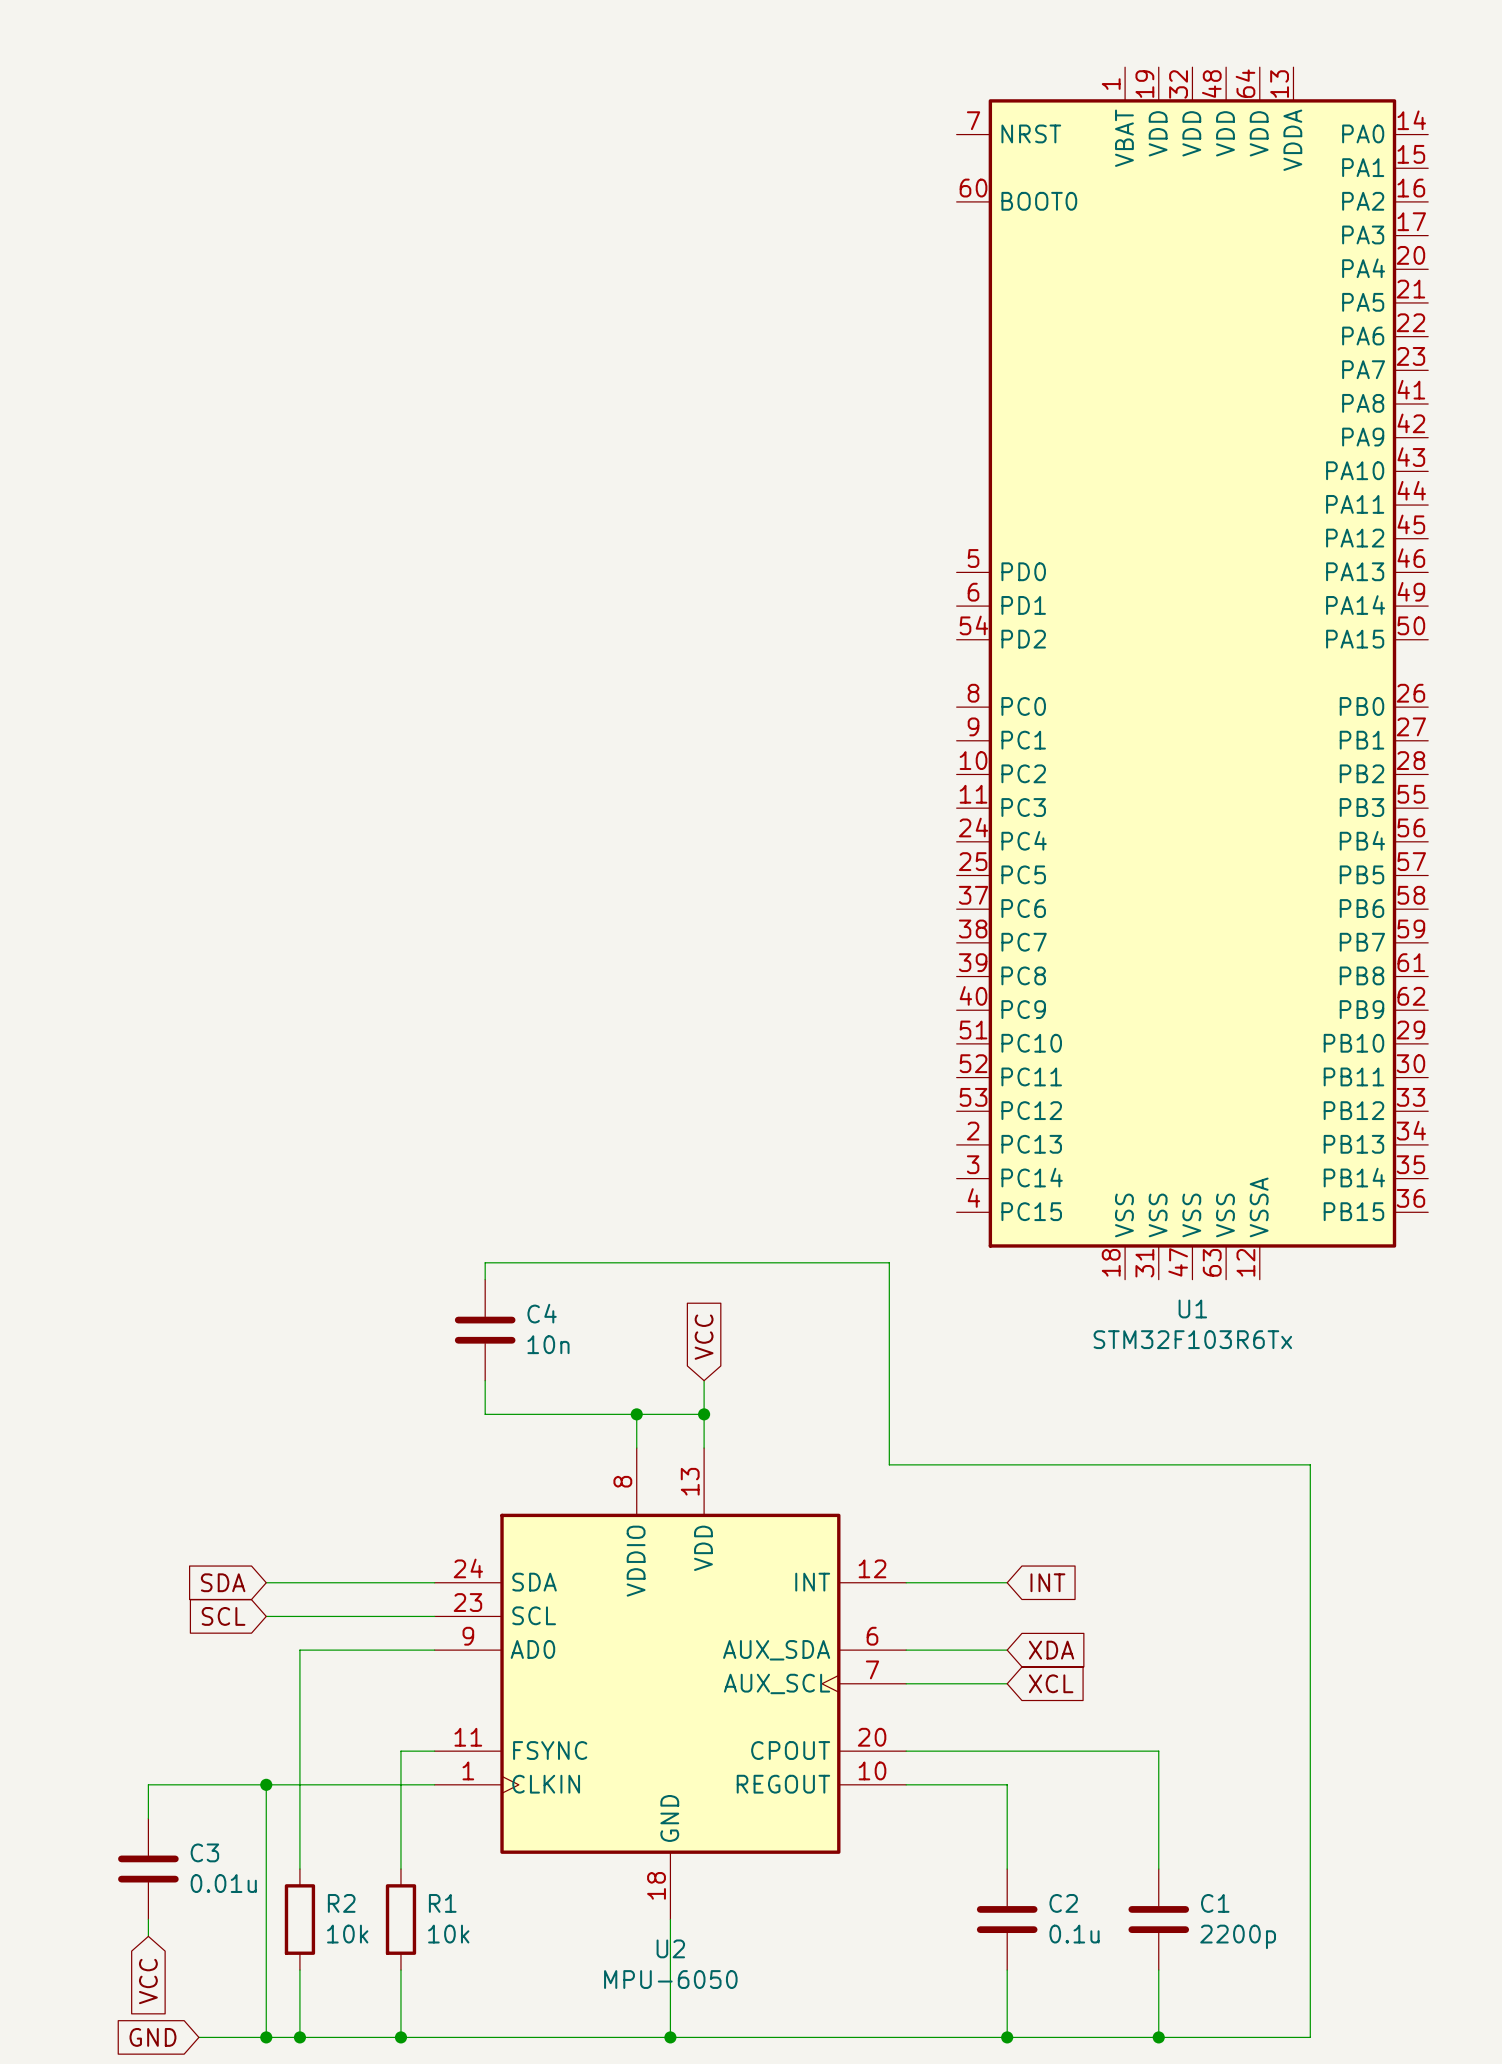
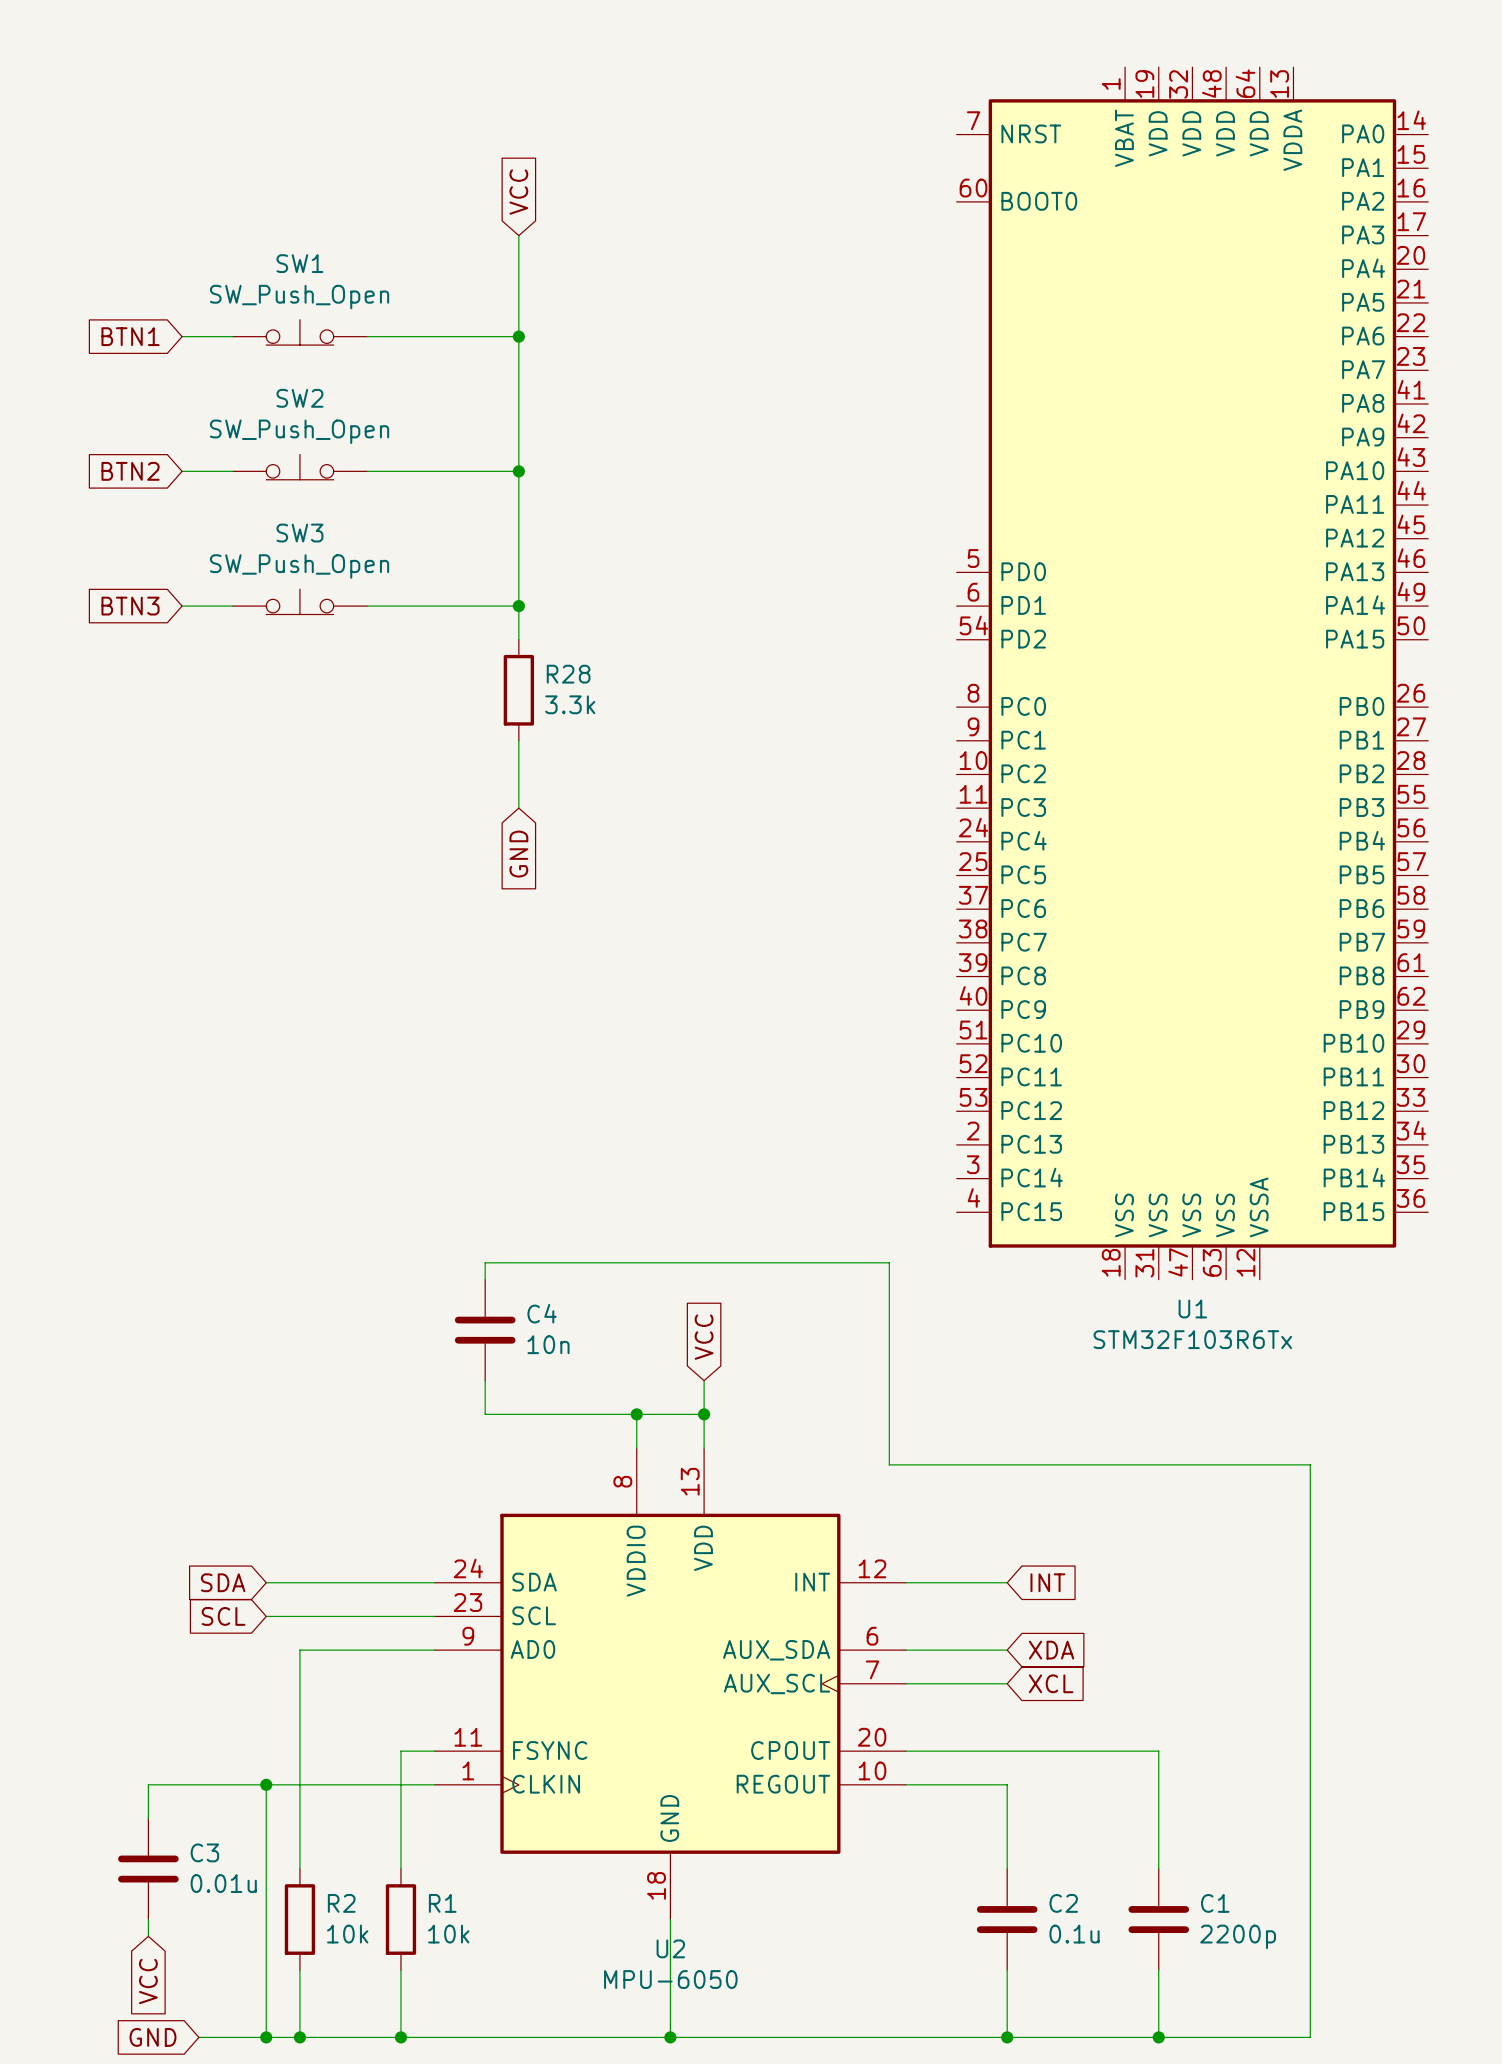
global label: none -> VCC (518, 192)
wire: none -> (518, 235) (518, 639)
SW1: none -> SW_Push_Open (299, 332)
global label: none -> BTN1 (130, 336)
wire: none -> (182, 336) (232, 336)
wire: none -> (367, 336) (518, 336)
junction: none -> (518, 336)
SW2: none -> SW_Push_Open (299, 467)
global label: none -> BTN2 (130, 471)
wire: none -> (182, 471) (232, 471)
wire: none -> (367, 471) (518, 471)
junction: none -> (518, 471)
SW3: none -> SW_Push_Open (299, 601)
global label: none -> BTN3 (130, 606)
wire: none -> (182, 606) (232, 606)
wire: none -> (367, 606) (518, 606)
junction: none -> (518, 606)
R28: none -> 3.3k (518, 690)
wire: none -> (518, 740) (518, 808)
global label: none -> GND (518, 854)

